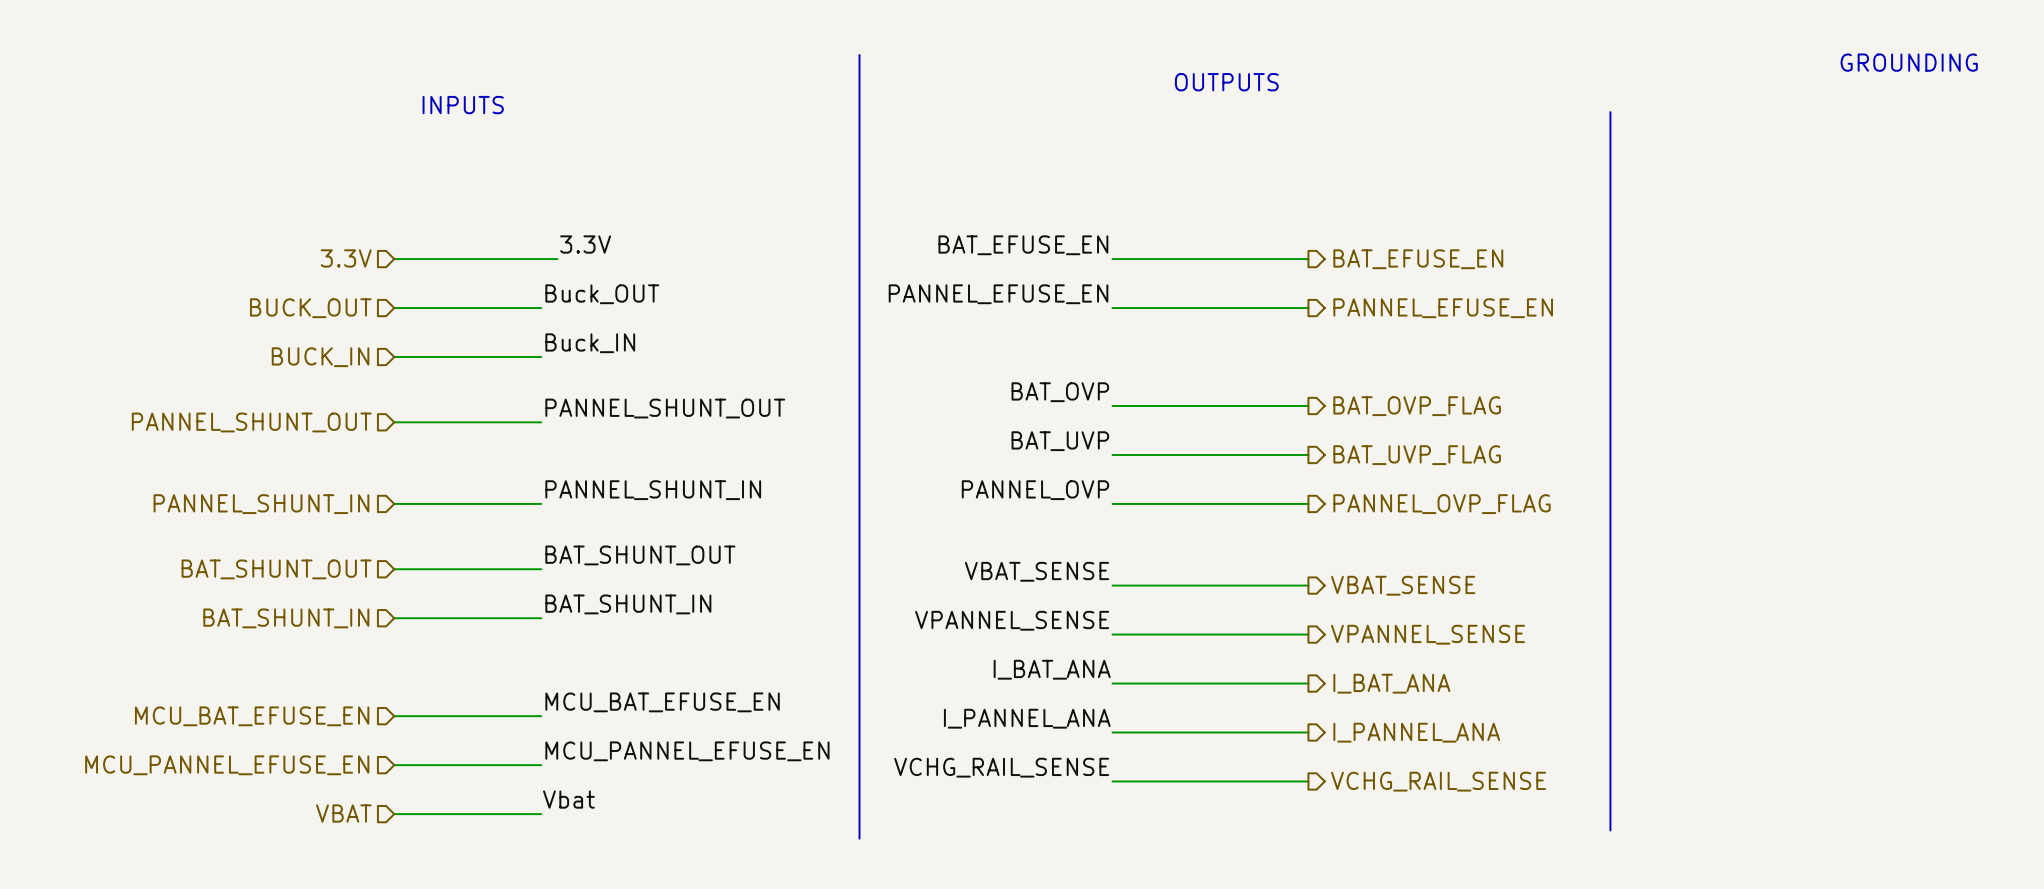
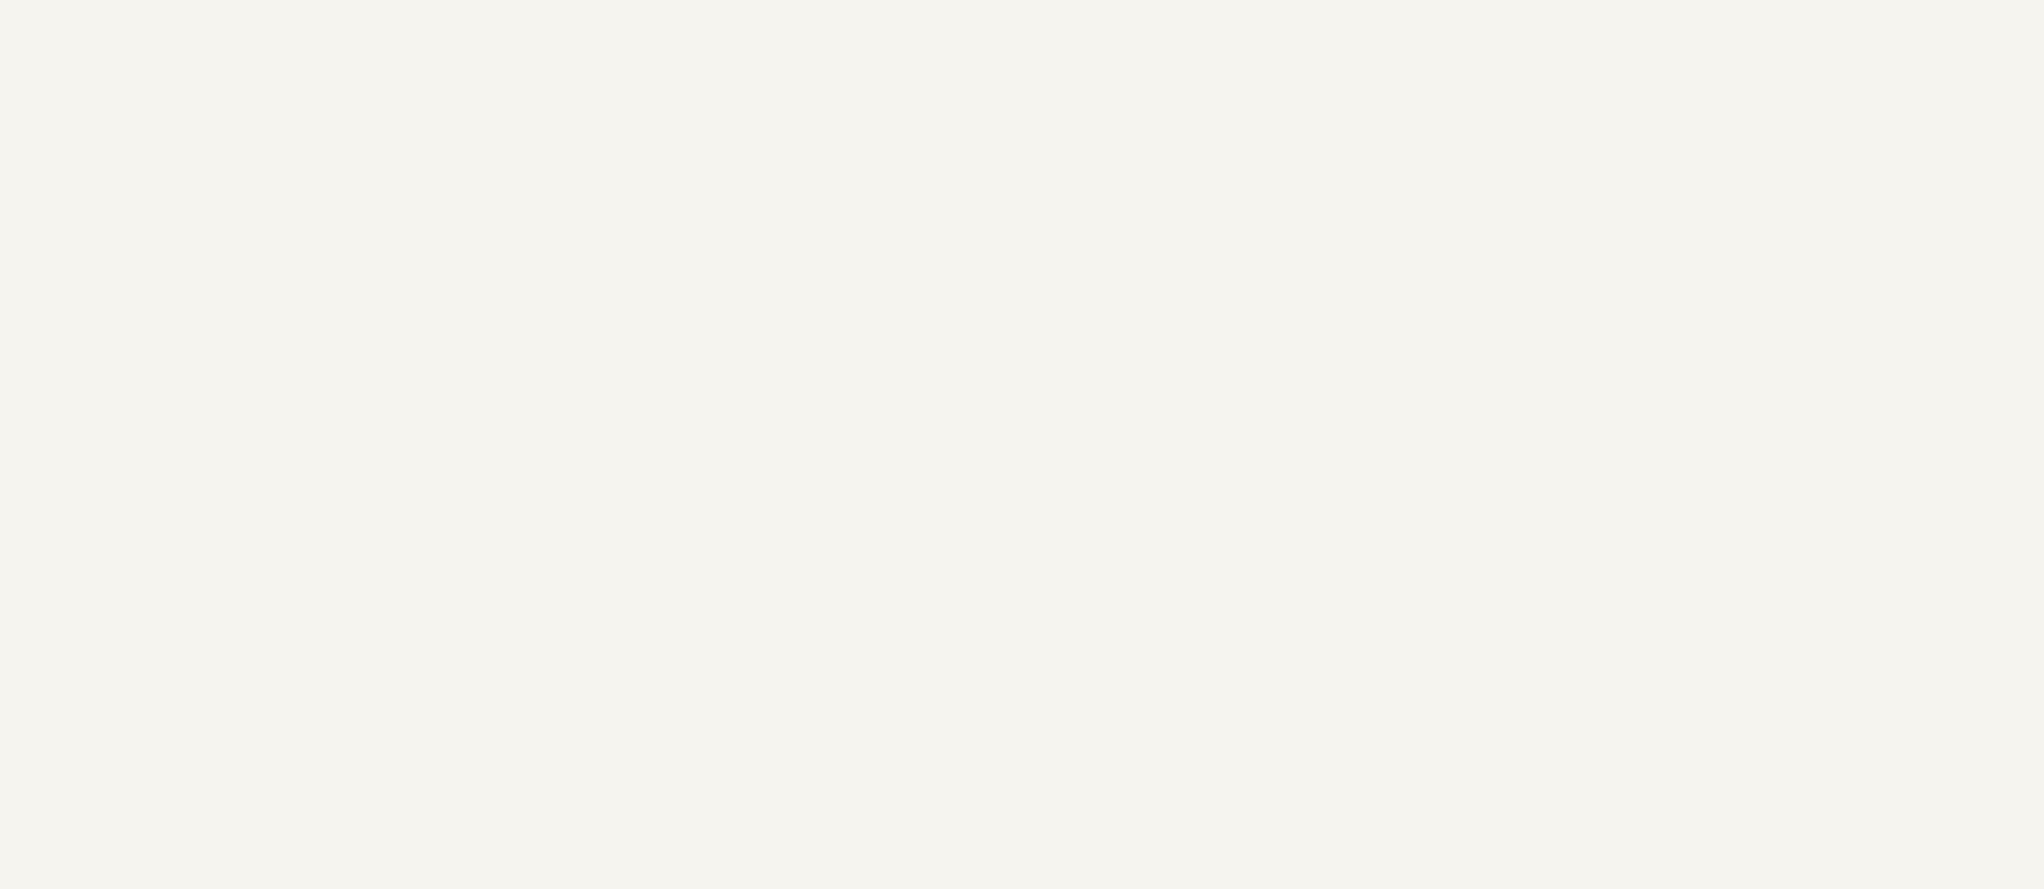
line: (859, 55) (859, 838) -> none
text: GROUNDING (1909, 62) -> none
text: OUTPUTS (1226, 82) -> none
text: INPUTS (463, 105) -> none
line: (1610, 112) (1610, 830) -> none
label: 3.3V (585, 244) -> none
label: BAT_EFUSE_EN (1023, 245) -> none
hierarchical label: 3.3V (346, 258) -> none
wire: (394, 259) (557, 259) -> none
wire: (1112, 259) (1308, 259) -> none
hierarchical label: BAT_EFUSE_EN (1418, 259) -> none
label: Buck_OUT (602, 294) -> none
label: PANNEL_EFUSE_EN (998, 294) -> none
hierarchical label: BUCK_OUT (310, 308) -> none
wire: (394, 308) (541, 308) -> none
wire: (1112, 308) (1308, 308) -> none
hierarchical label: PANNEL_EFUSE_EN (1443, 308) -> none
label: Buck_IN (590, 343) -> none
hierarchical label: BUCK_IN (320, 357) -> none
wire: (394, 357) (541, 357) -> none
label: BAT_OVP (1060, 392) -> none
wire: (1112, 406) (1308, 406) -> none
hierarchical label: BAT_OVP_FLAG (1417, 406) -> none
label: PANNEL_SHUNT_OUT (665, 408) -> none
hierarchical label: PANNEL_SHUNT_OUT (251, 422) -> none
wire: (394, 422) (541, 422) -> none
label: BAT_UVP (1060, 441) -> none
wire: (1112, 454) (1308, 454) -> none
hierarchical label: BAT_UVP_FLAG (1417, 455) -> none
label: PANNEL_SHUNT_IN (653, 490) -> none
label: PANNEL_OVP (1035, 490) -> none
wire: (394, 503) (541, 503) -> none
wire: (1112, 503) (1308, 503) -> none
hierarchical label: PANNEL_SHUNT_IN (261, 504) -> none
hierarchical label: PANNEL_OVP_FLAG (1442, 504) -> none
label: BAT_SHUNT_OUT (640, 555) -> none
hierarchical label: BAT_SHUNT_OUT (276, 569) -> none
wire: (394, 569) (541, 569) -> none
label: VBAT_SENSE (1037, 571) -> none
wire: (1112, 585) (1308, 585) -> none
hierarchical label: VBAT_SENSE (1403, 585) -> none
label: BAT_SHUNT_IN (628, 604) -> none
hierarchical label: BAT_SHUNT_IN (286, 618) -> none
wire: (394, 618) (541, 618) -> none
label: VPANNEL_SENSE (1012, 620) -> none
wire: (1112, 634) (1308, 634) -> none
hierarchical label: VPANNEL_SENSE (1428, 634) -> none
label: I_BAT_ANA (1052, 669) -> none
wire: (1112, 683) (1308, 683) -> none
hierarchical label: I_BAT_ANA (1391, 683) -> none
label: MCU_BAT_EFUSE_EN (662, 702) -> none
hierarchical label: MCU_BAT_EFUSE_EN (252, 716) -> none
wire: (394, 716) (541, 716) -> none
label: I_PANNEL_ANA (1027, 718) -> none
wire: (1112, 732) (1308, 732) -> none
hierarchical label: I_PANNEL_ANA (1416, 732) -> none
label: MCU_PANNEL_EFUSE_EN (687, 751) -> none
hierarchical label: MCU_PANNEL_EFUSE_EN (227, 765) -> none
wire: (394, 765) (541, 765) -> none
label: VCHG_RAIL_SENSE (1001, 767) -> none
wire: (1112, 781) (1308, 781) -> none
hierarchical label: VCHG_RAIL_SENSE (1438, 781) -> none
label: Vbat (568, 799) -> none
hierarchical label: VBAT (343, 813) -> none
wire: (394, 814) (541, 814) -> none

